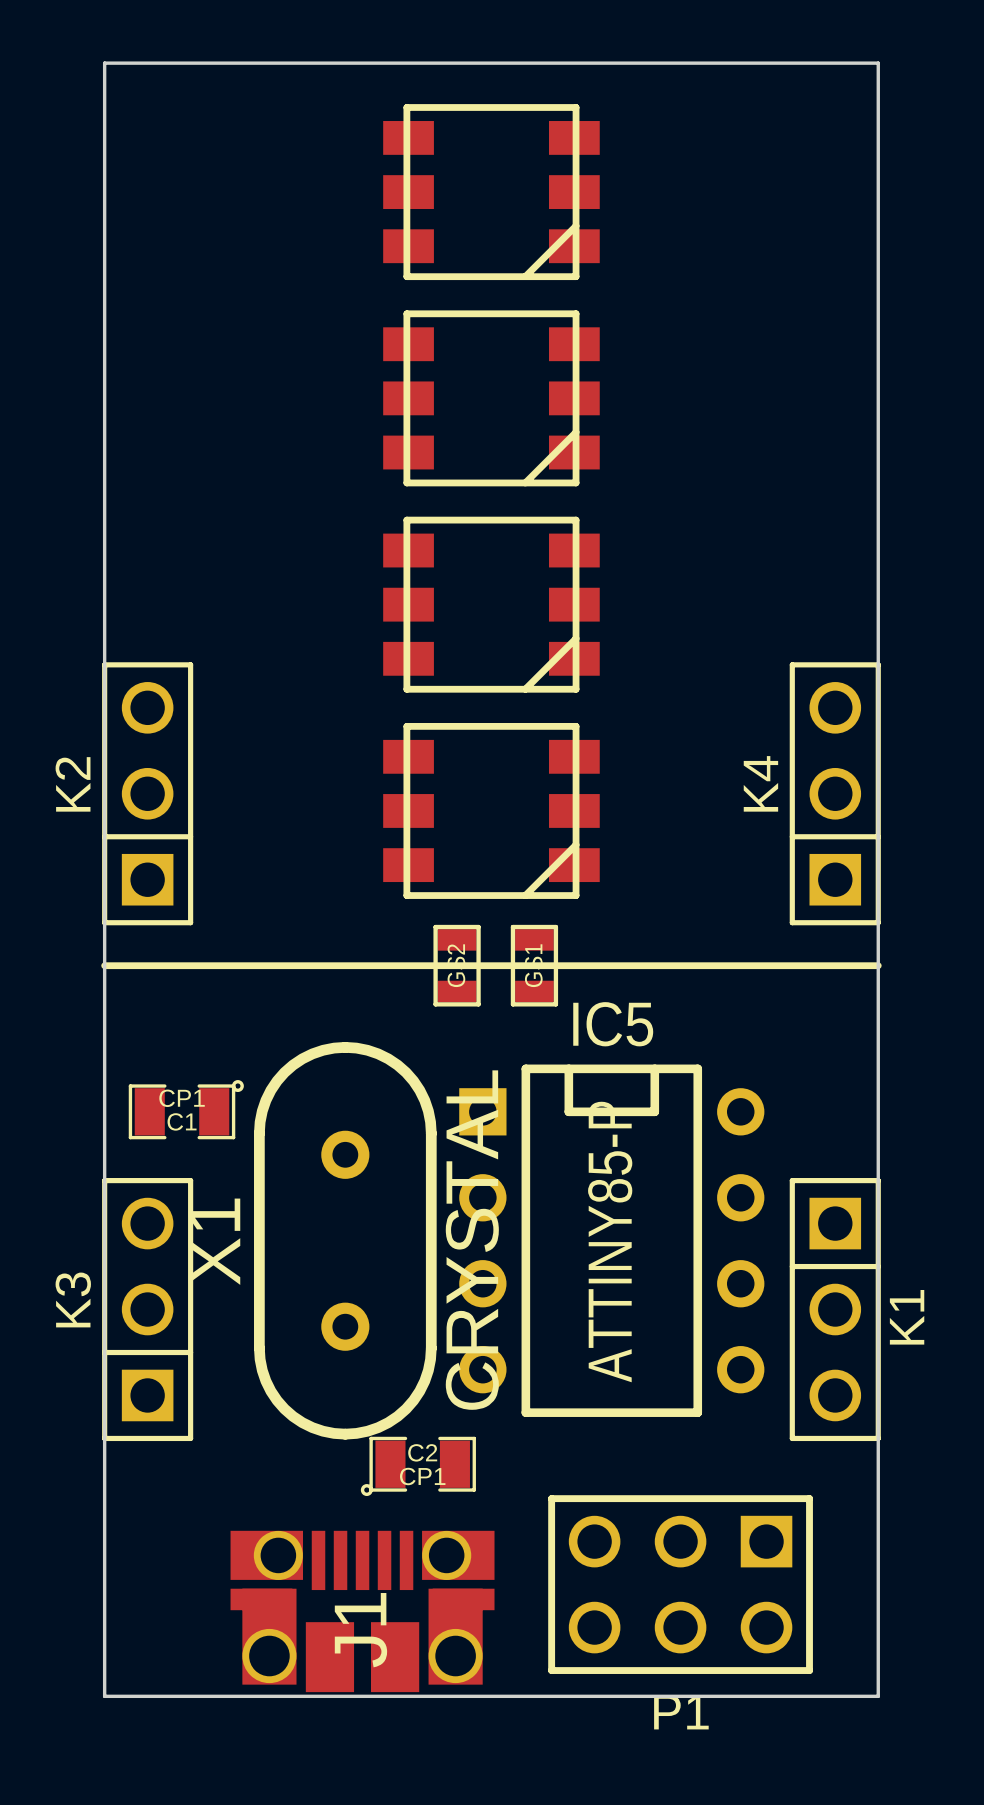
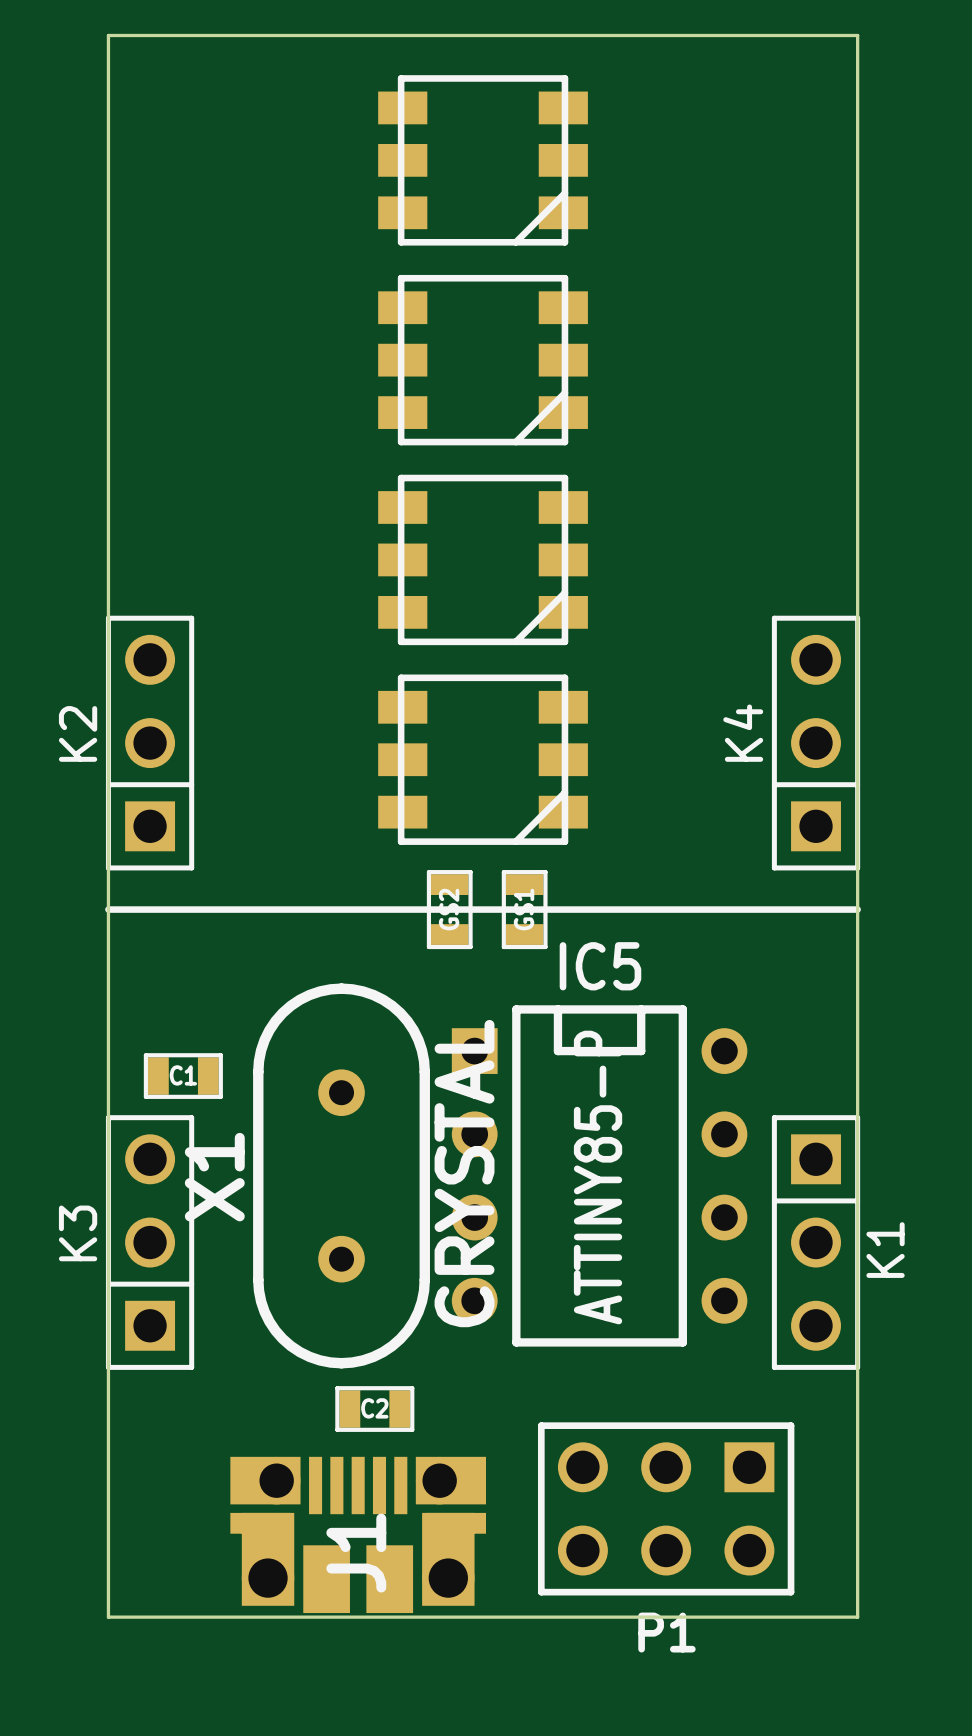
C1 footprint: [128, 1080, 244, 1140] -> [143, 1053, 223, 1099]
C1 value: CP1 (182, 1098) -> none
C2 footprint: [360, 1436, 476, 1497] -> [335, 1386, 415, 1432]
C2 value: CP1 (422, 1476) -> none

